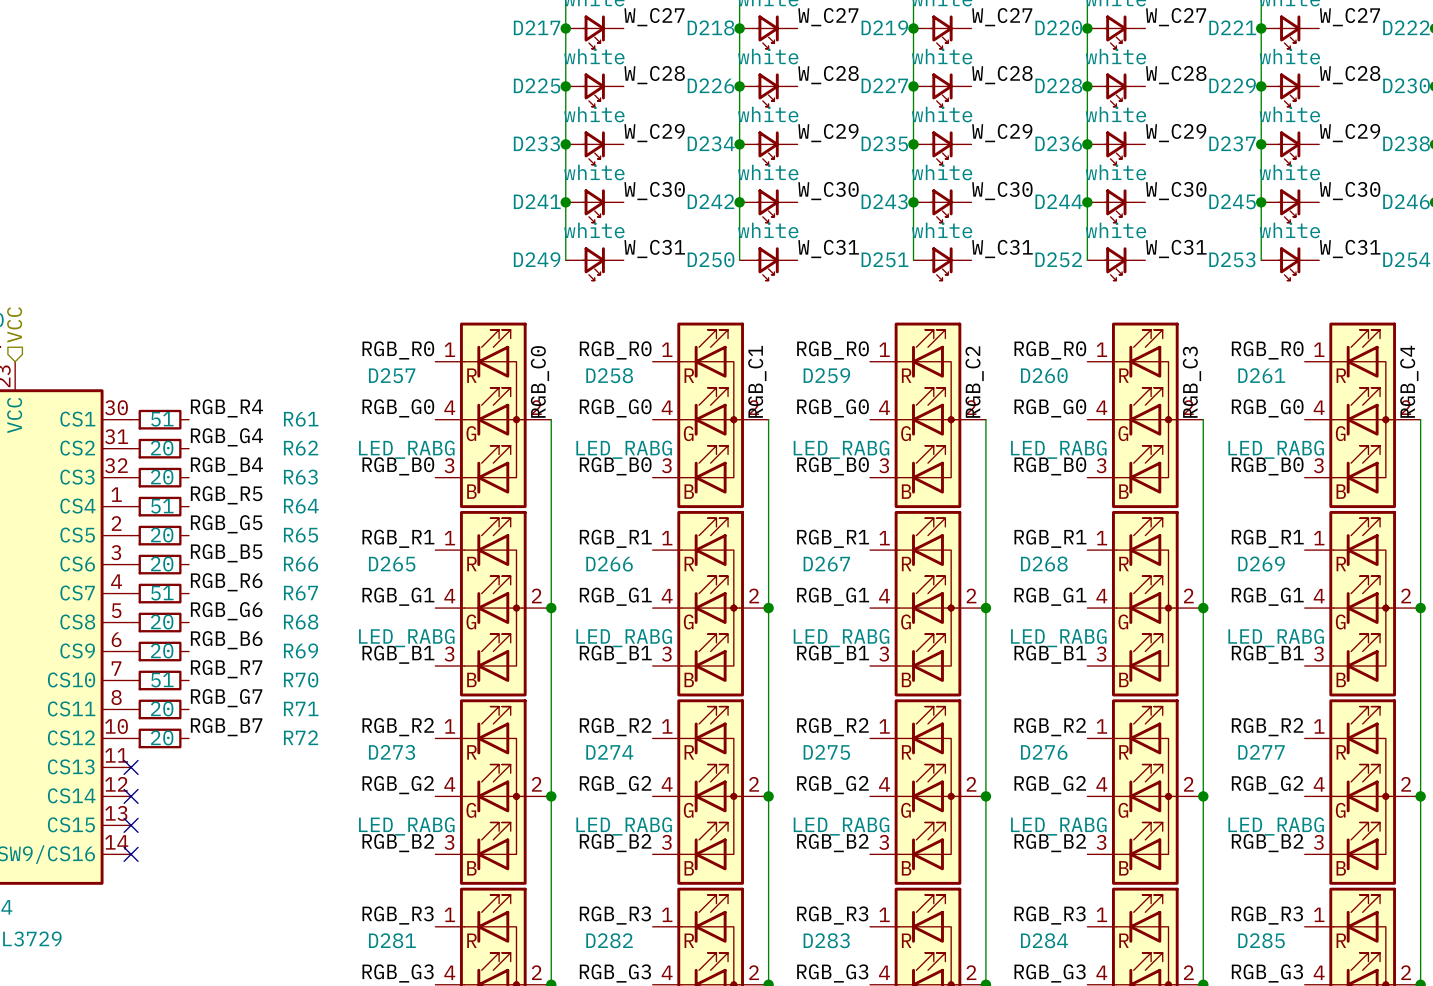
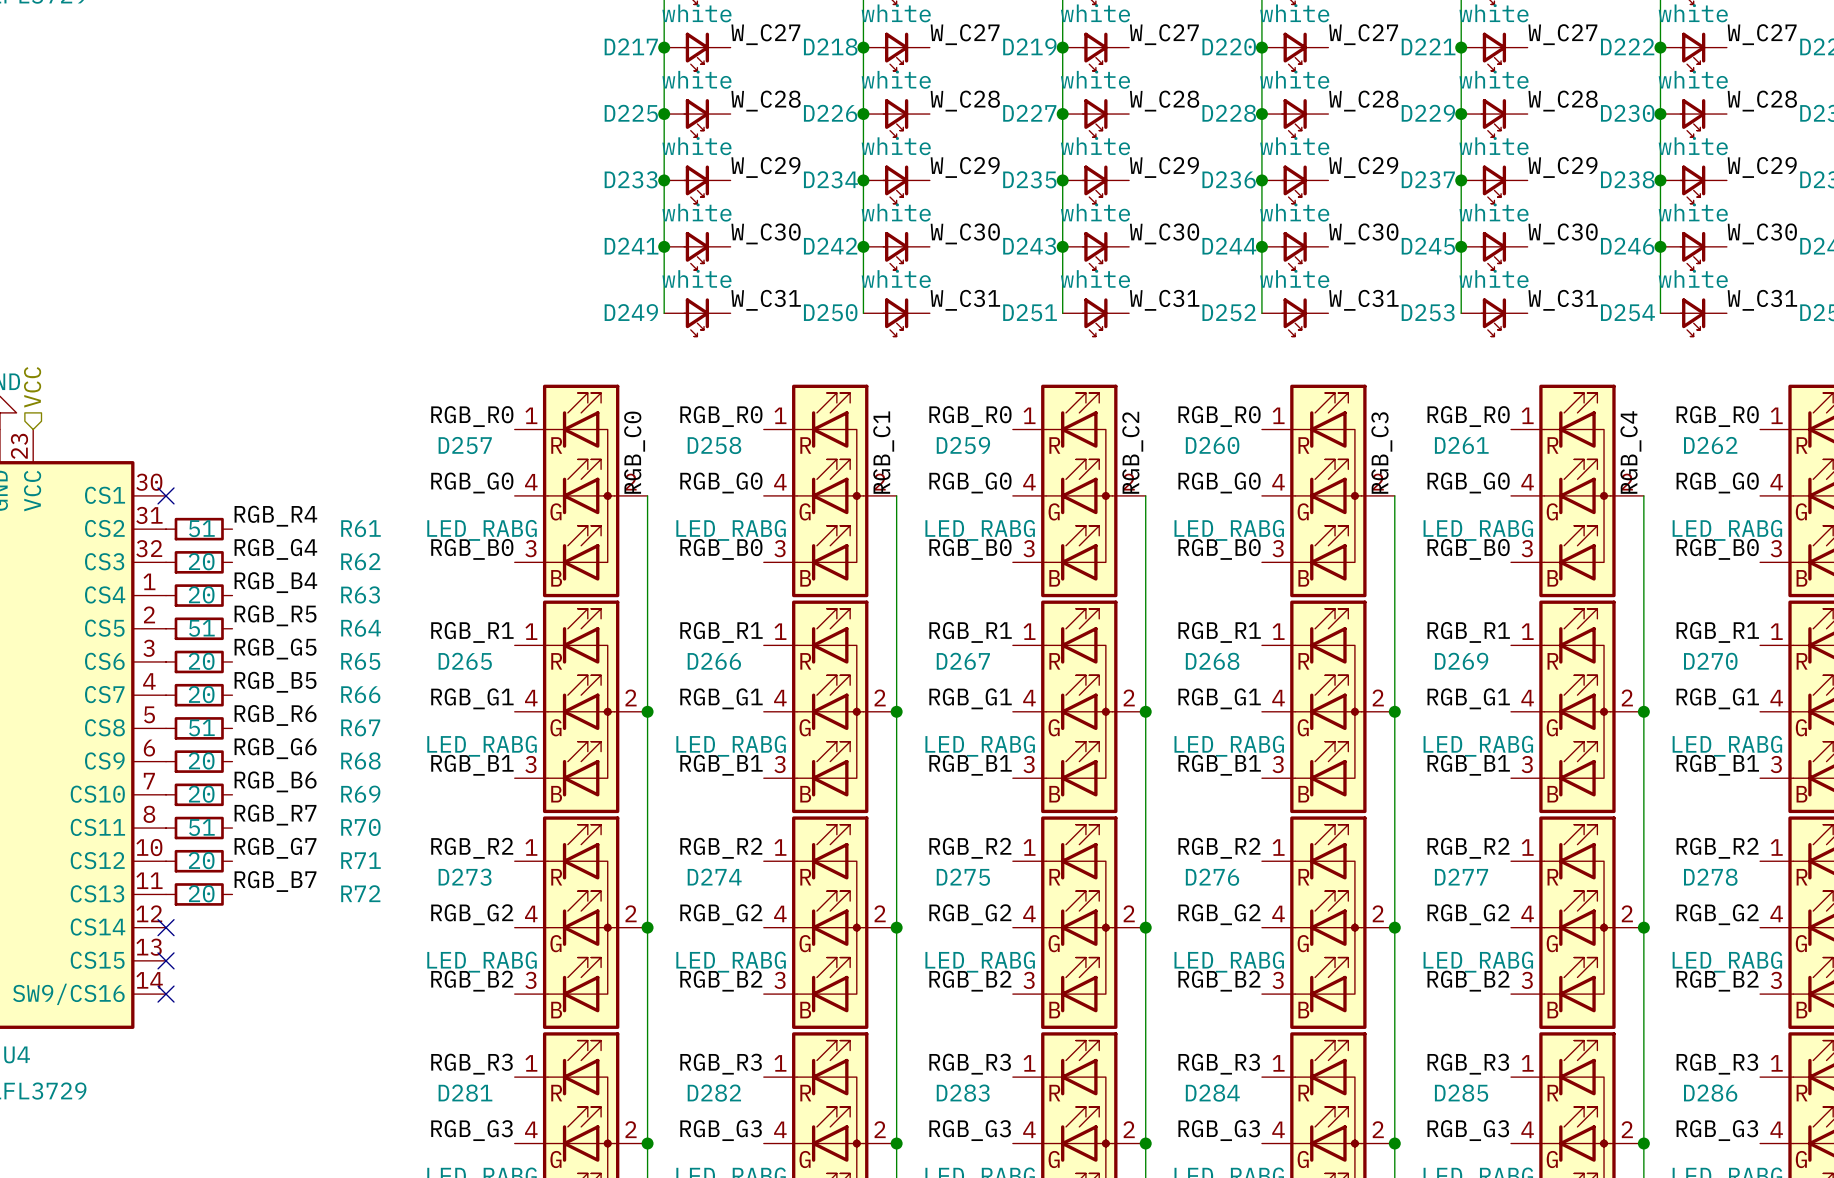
label: RGB_R4 (226, 408) -> none
no-connect mark: none -> (166, 495)
R61: 51 (160, 419) -> none
label: RGB_G4 (226, 437) -> RGB_R4 (275, 516)
R62 value: 20 (162, 448) -> 51 (201, 528)
R62 name: R62 (301, 448) -> R61 (360, 528)
label: RGB_B4 (226, 466) -> RGB_G4 (275, 549)
R63 name: R63 (300, 477) -> R62 (360, 561)
label: RGB_R5 (226, 495) -> RGB_B4 (275, 582)
R64 value: 51 (162, 506) -> 20 (201, 594)
R64 name: R64 (301, 506) -> R63 (360, 594)
label: RGB_G5 (226, 524) -> RGB_R5 (275, 615)
R65 value: 20 (162, 535) -> 51 (201, 628)
R65 name: R65 (300, 535) -> R64 (361, 628)
label: RGB_B5 (226, 553) -> RGB_G5 (275, 649)
R66 name: R66 (301, 564) -> R65 (360, 661)
label: RGB_R6 (226, 582) -> RGB_B5 (275, 682)
R67 value: 51 (162, 593) -> 20 (201, 694)
R67 name: R67 (300, 593) -> R66 (360, 694)
label: RGB_G6 (226, 611) -> RGB_R6 (275, 715)
R68 value: 20 (162, 621) -> 51 (201, 727)
R68 name: R68 (301, 621) -> R67 (360, 727)
label: RGB_B6 (226, 640) -> RGB_G6 (275, 748)
R69 name: R69 (301, 650) -> R68 (360, 760)
label: RGB_R7 (226, 669) -> RGB_B6 (275, 781)
R70 name: R70 (301, 679) -> R69 (360, 794)
R70 value: 51 (162, 680) -> 20 (201, 794)
label: RGB_G7 (226, 698) -> RGB_R7 (275, 815)
R71 value: 20 (162, 708) -> 51 (201, 827)
R71 name: R71 (301, 708) -> R70 (360, 827)
label: RGB_B7 (226, 727) -> RGB_G7 (275, 848)
R72 name: R72 (301, 737) -> R71 (360, 860)
label: none -> RGB_B7 (275, 881)
no-connect mark: (131, 767) -> none
R72: none -> 20 (199, 894)

